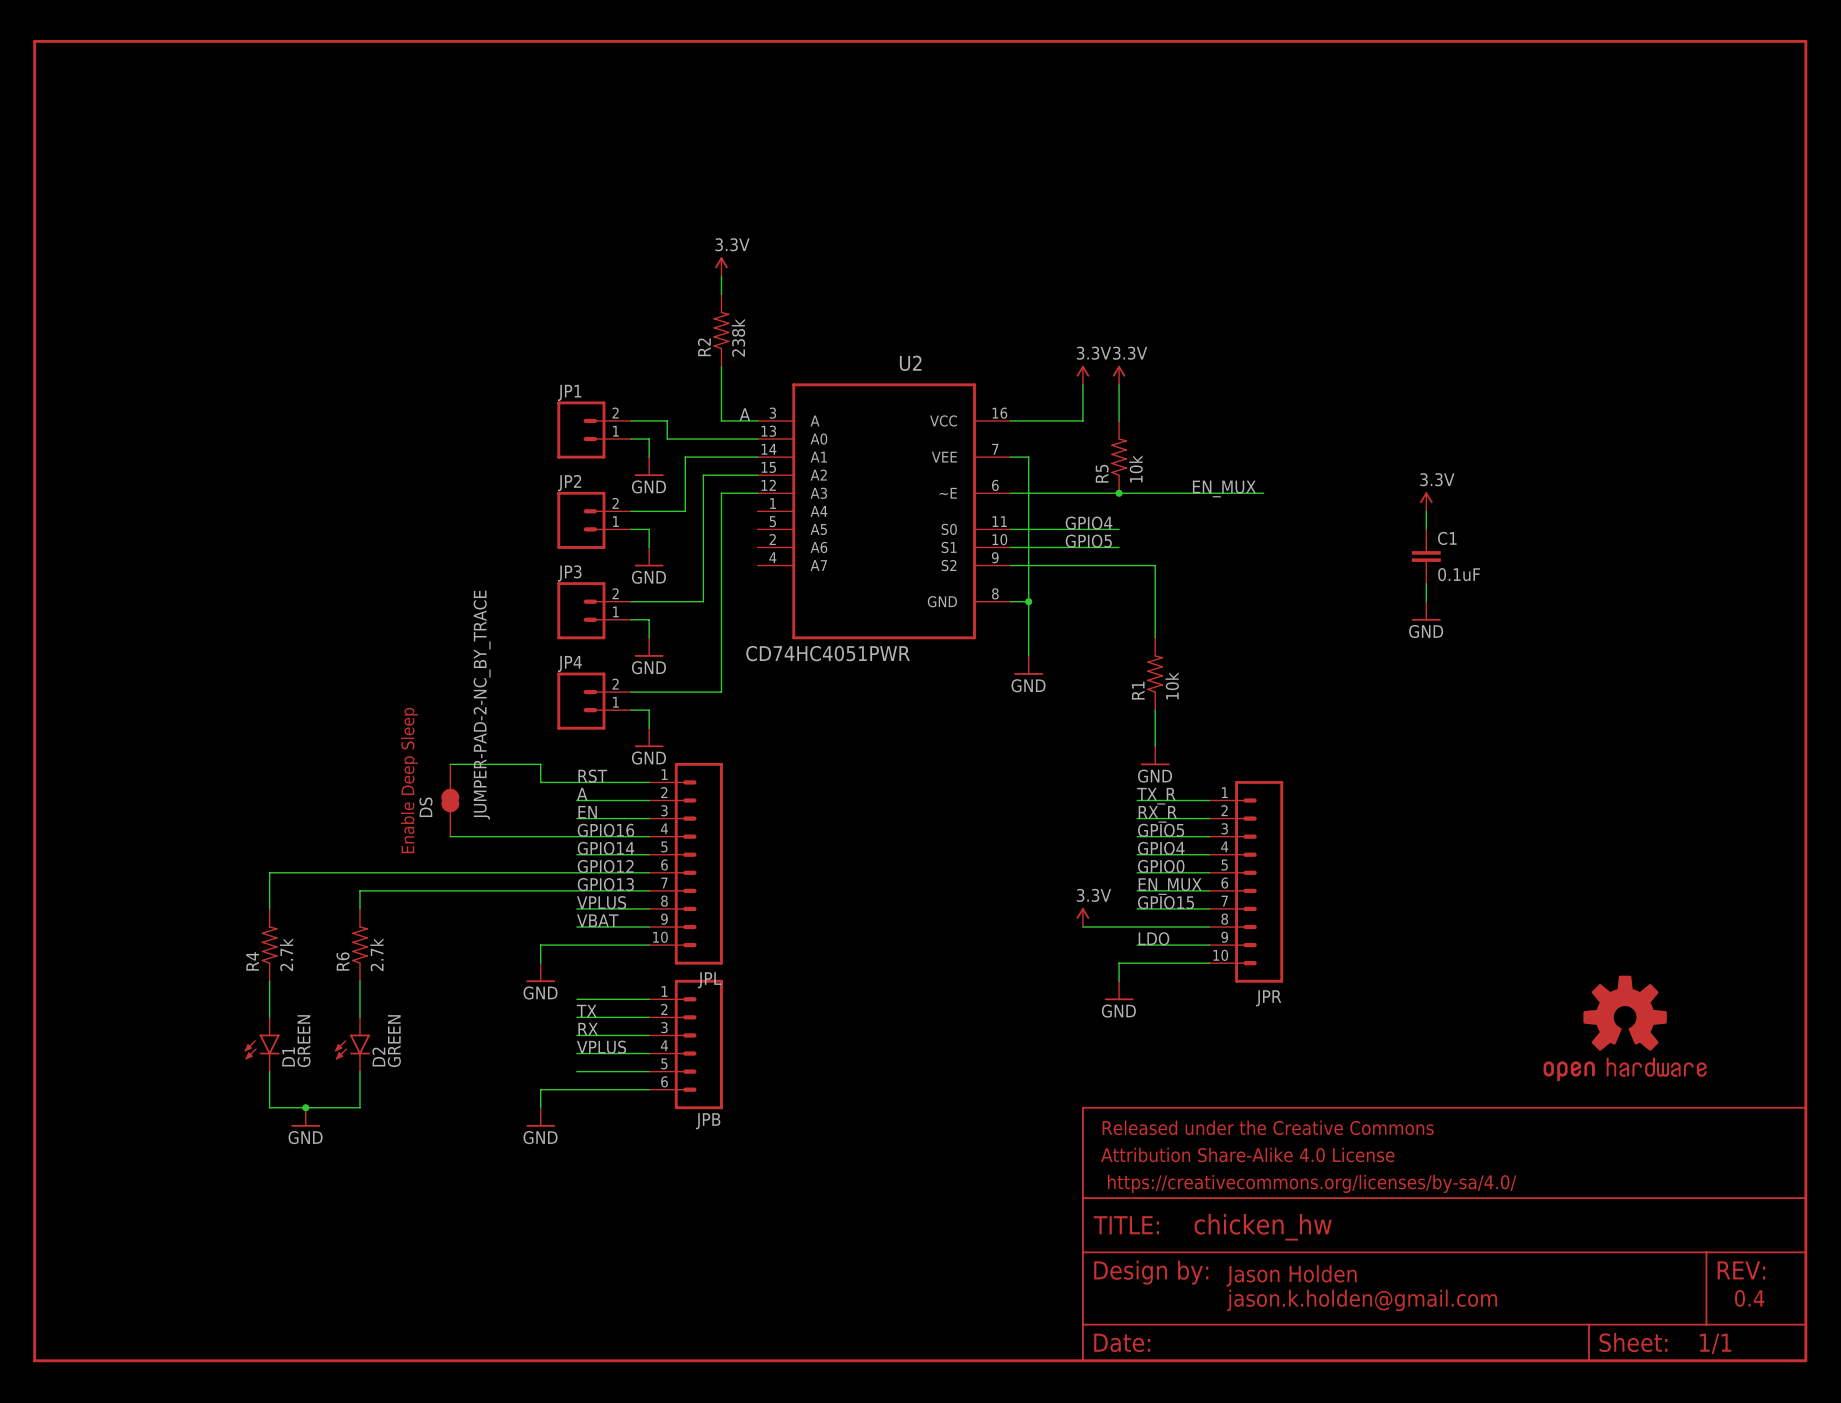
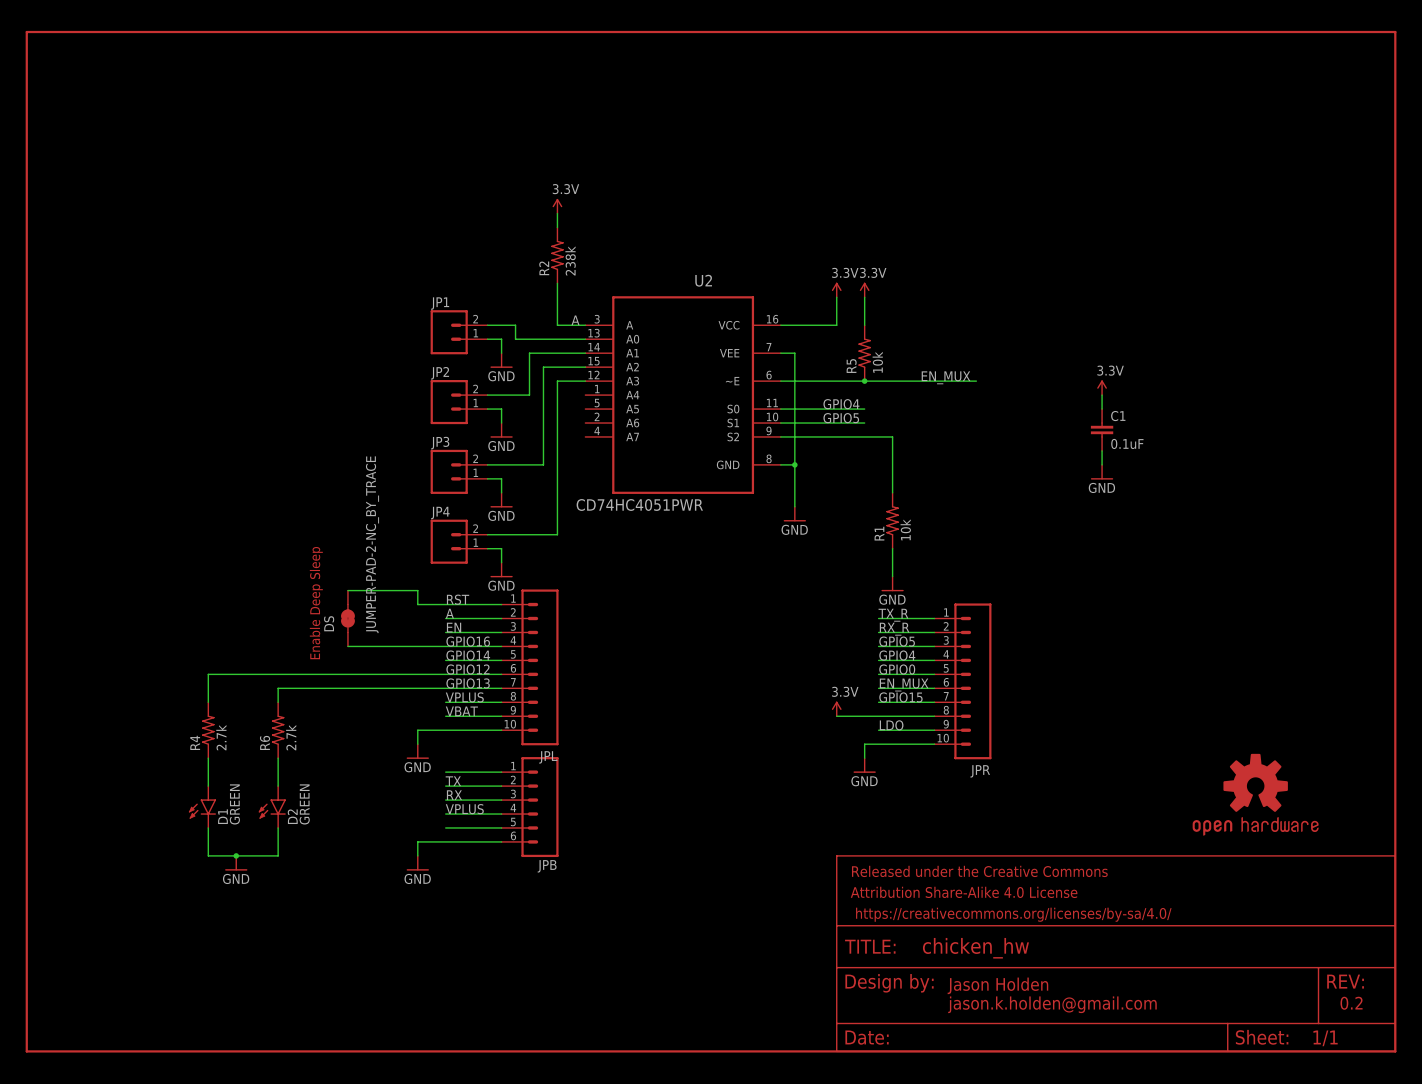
text: 0.4 (1749, 1298) -> 0.2 (1351, 1003)

